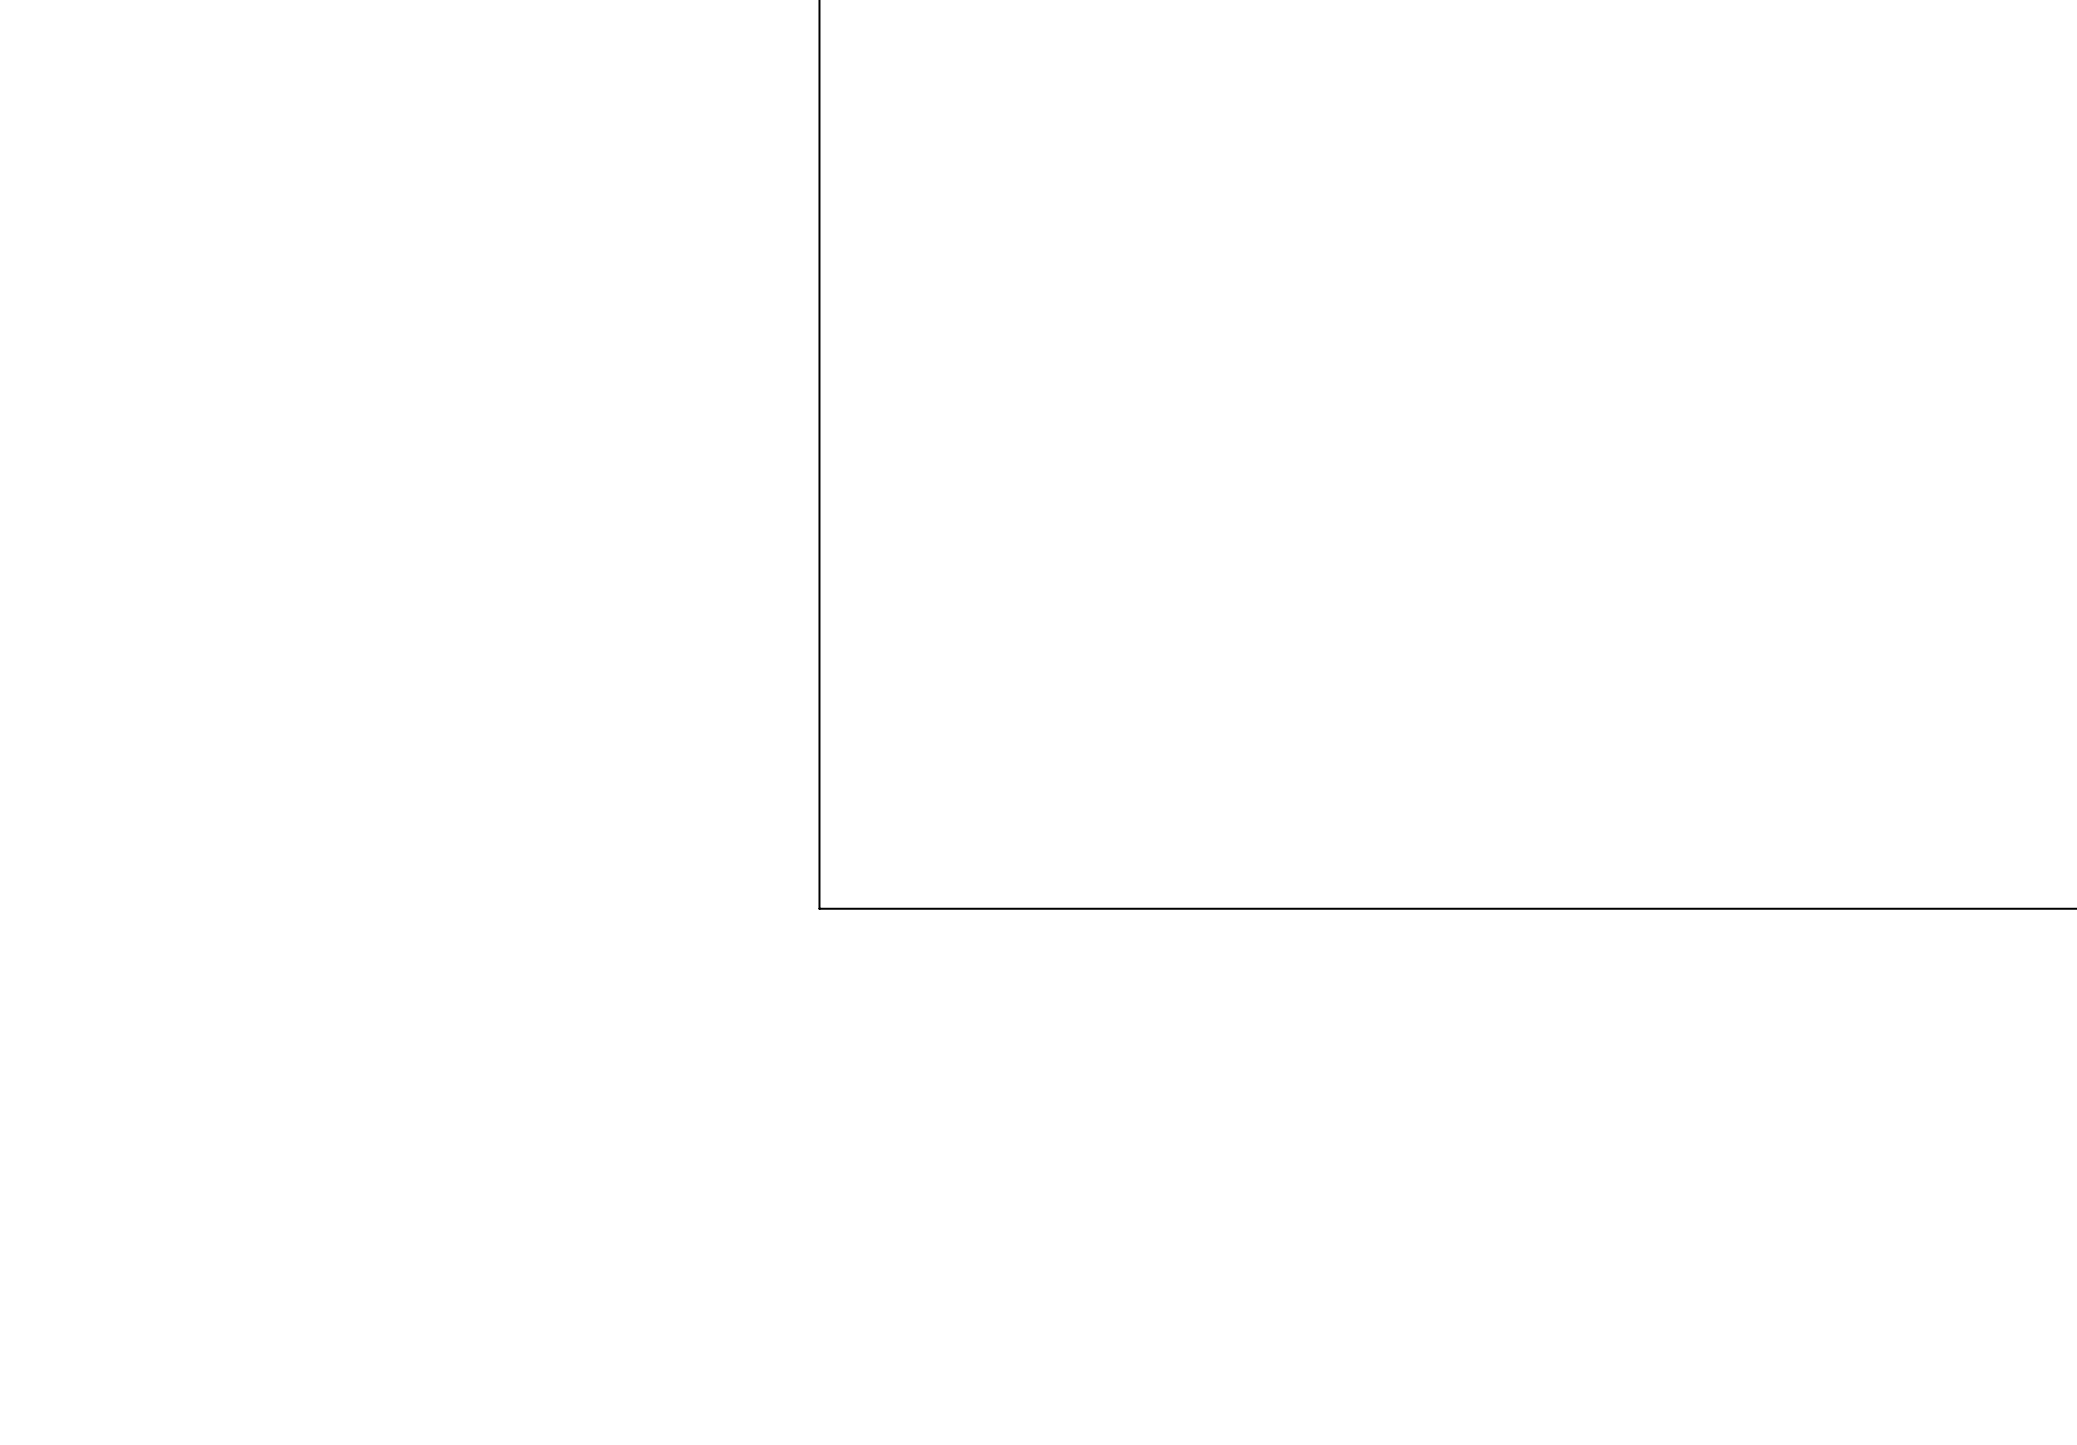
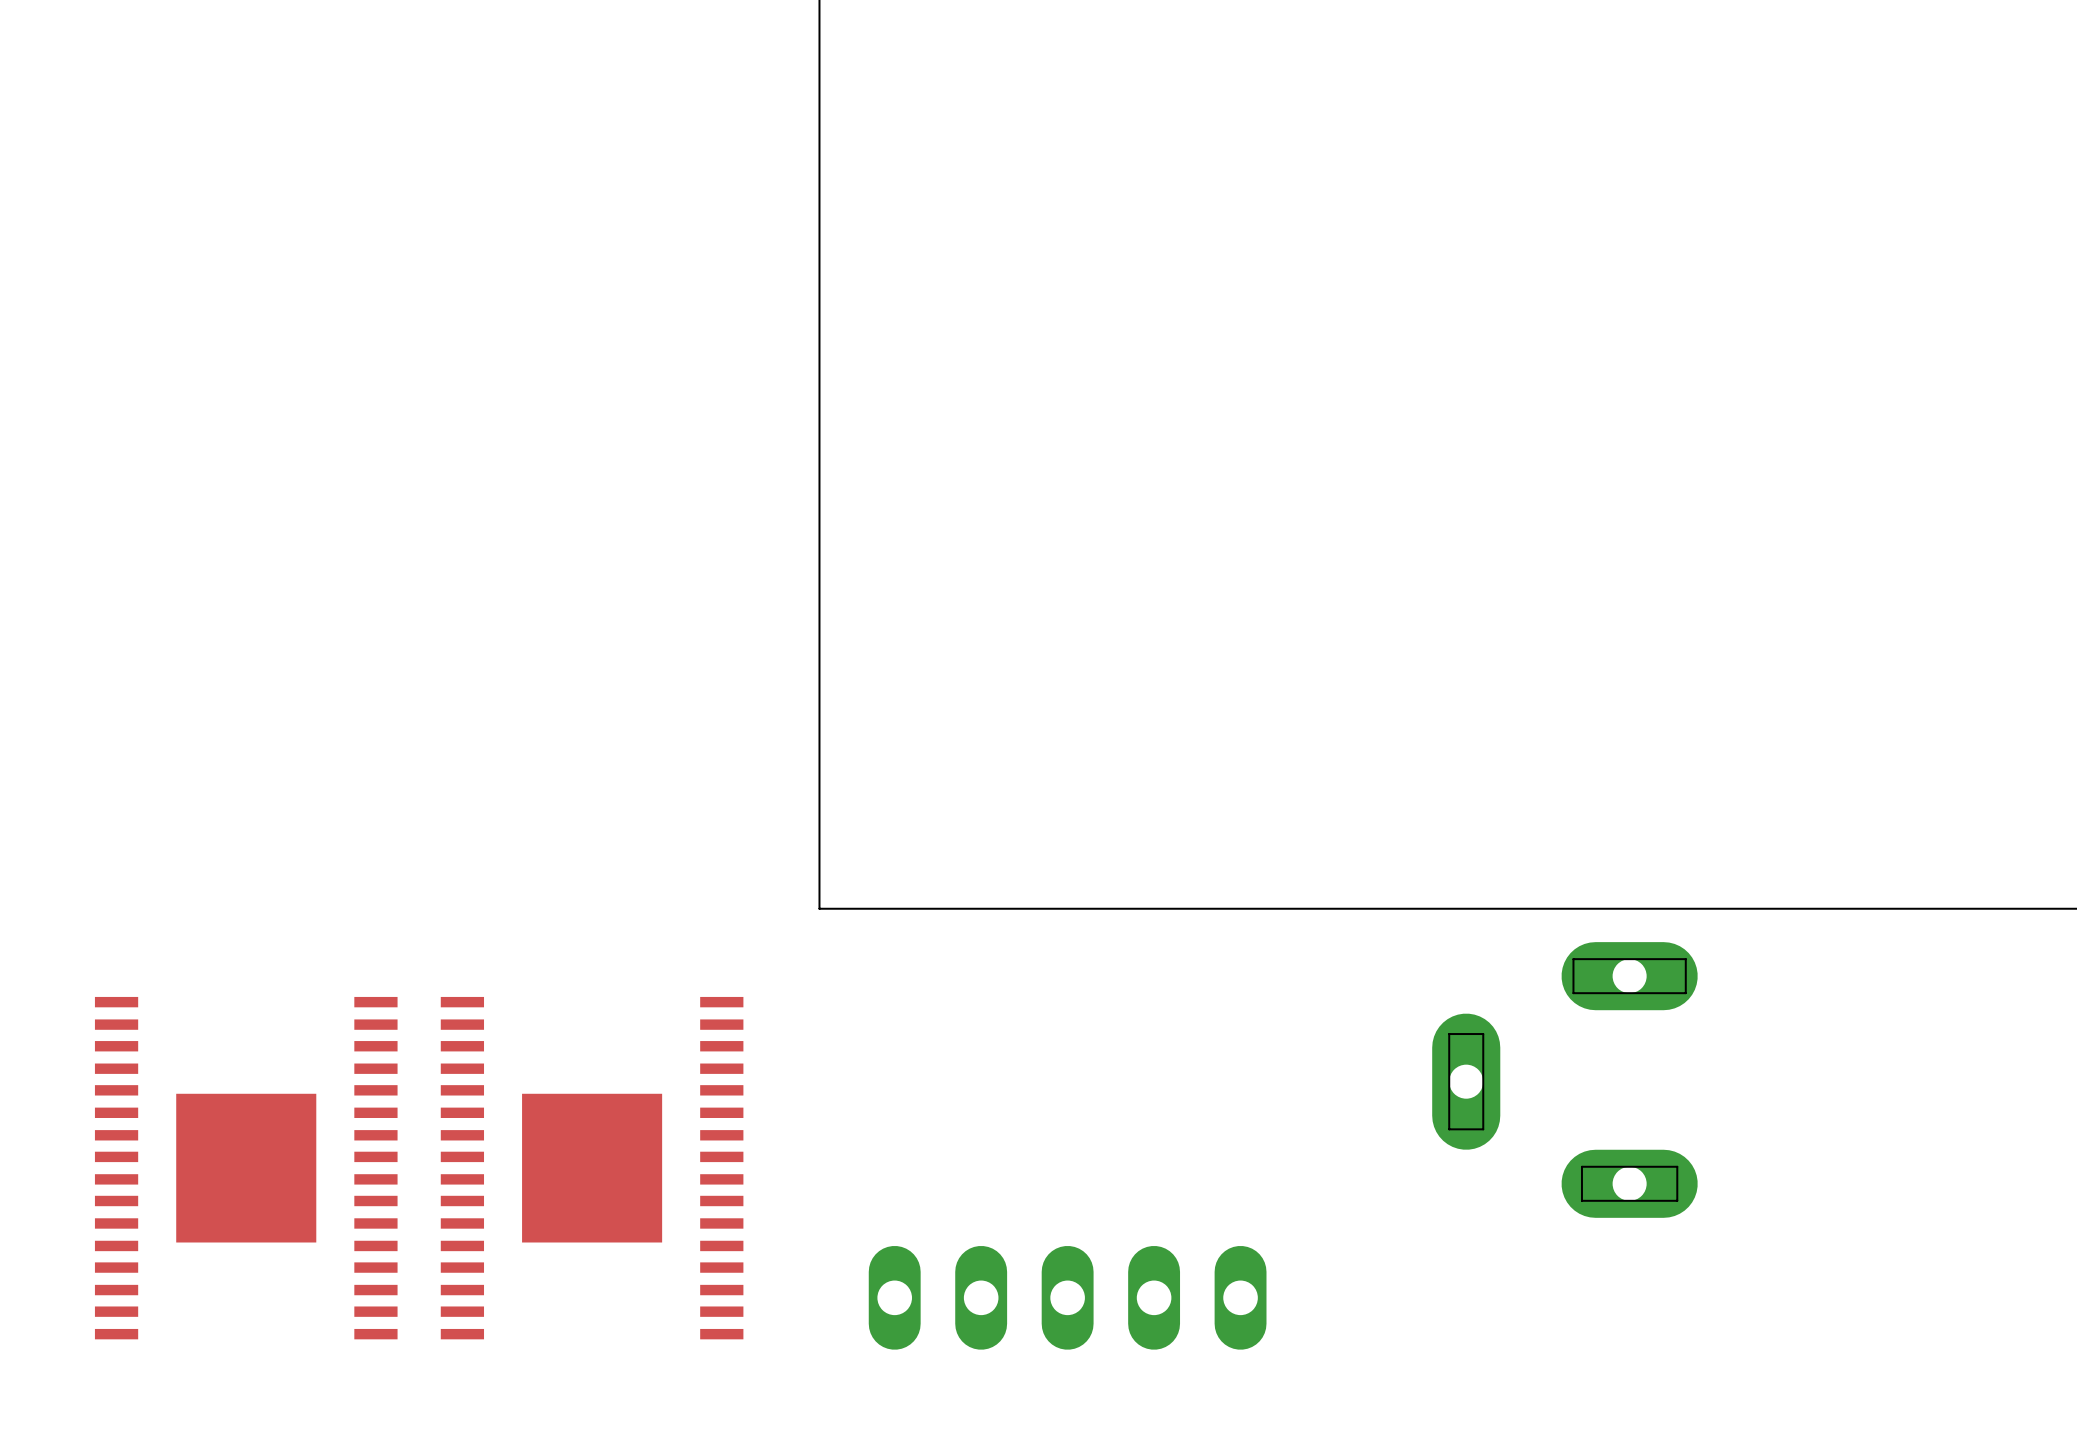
part: none -> (1564, 1079)
part: none -> (246, 1168)
part: none -> (592, 1168)
part: none -> (1067, 1297)

